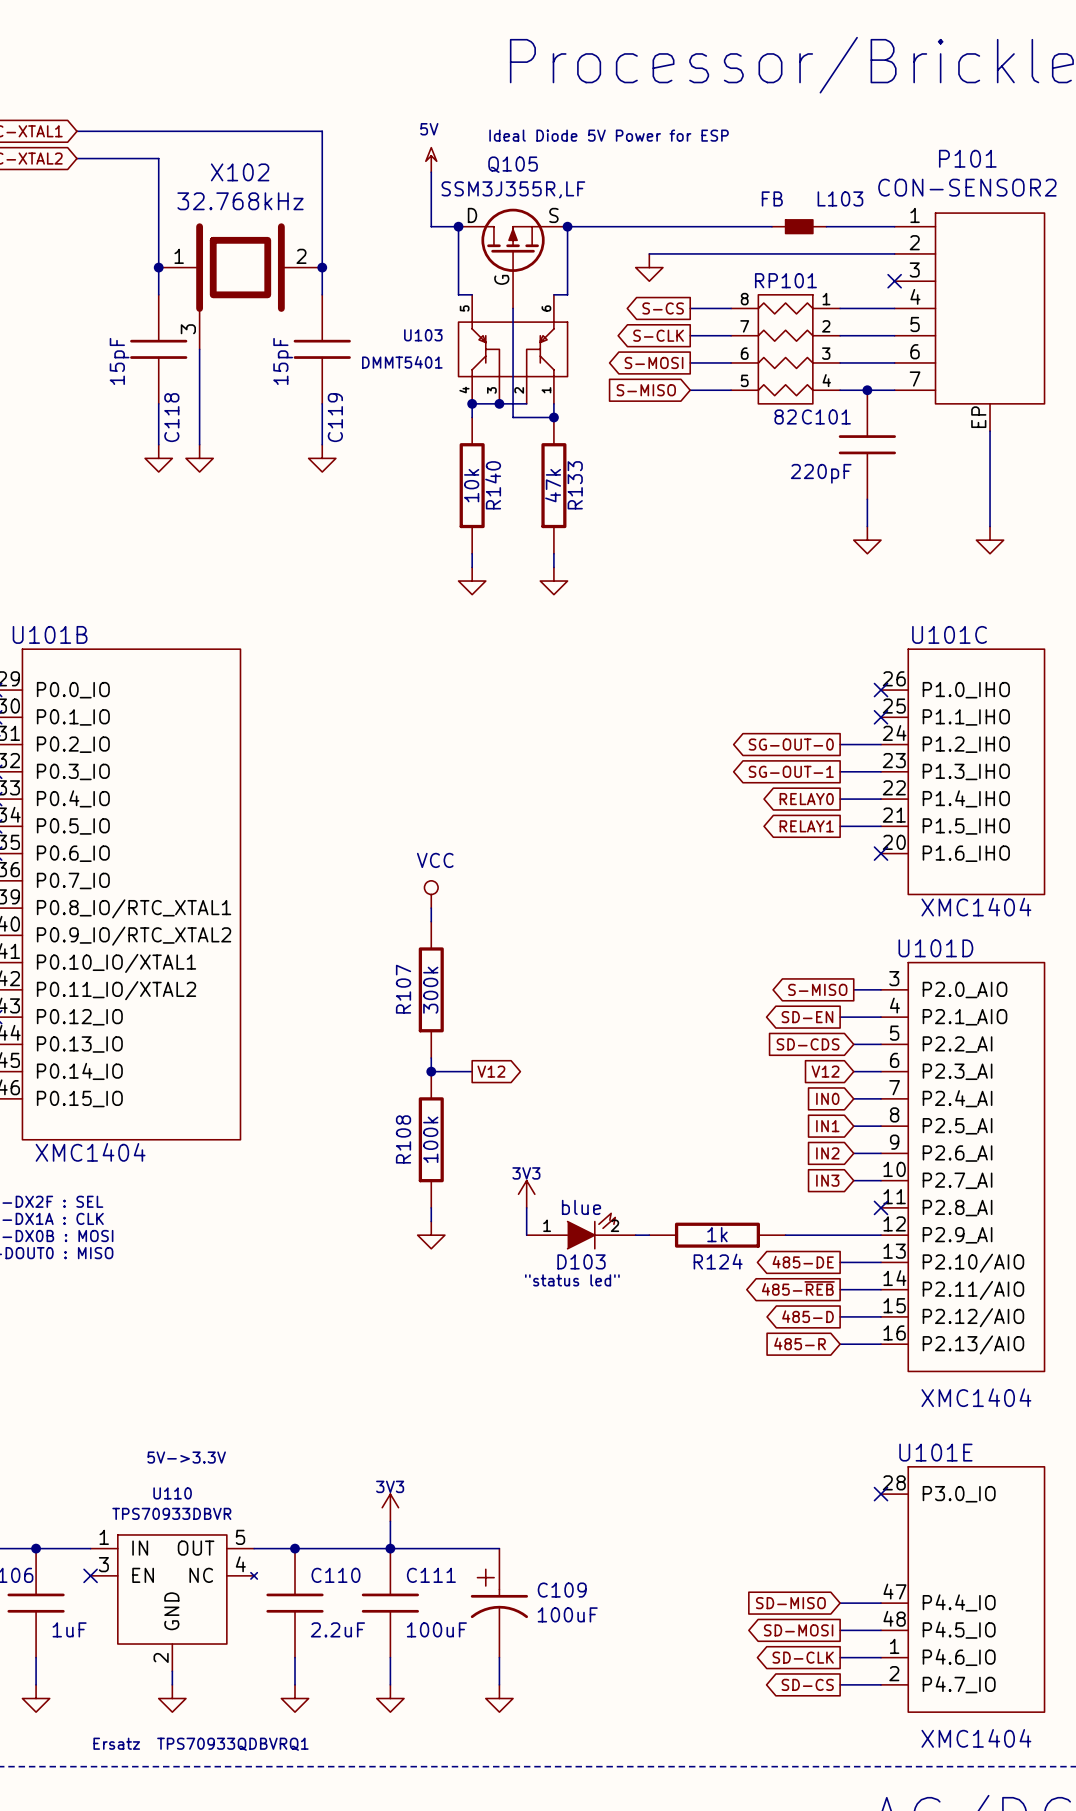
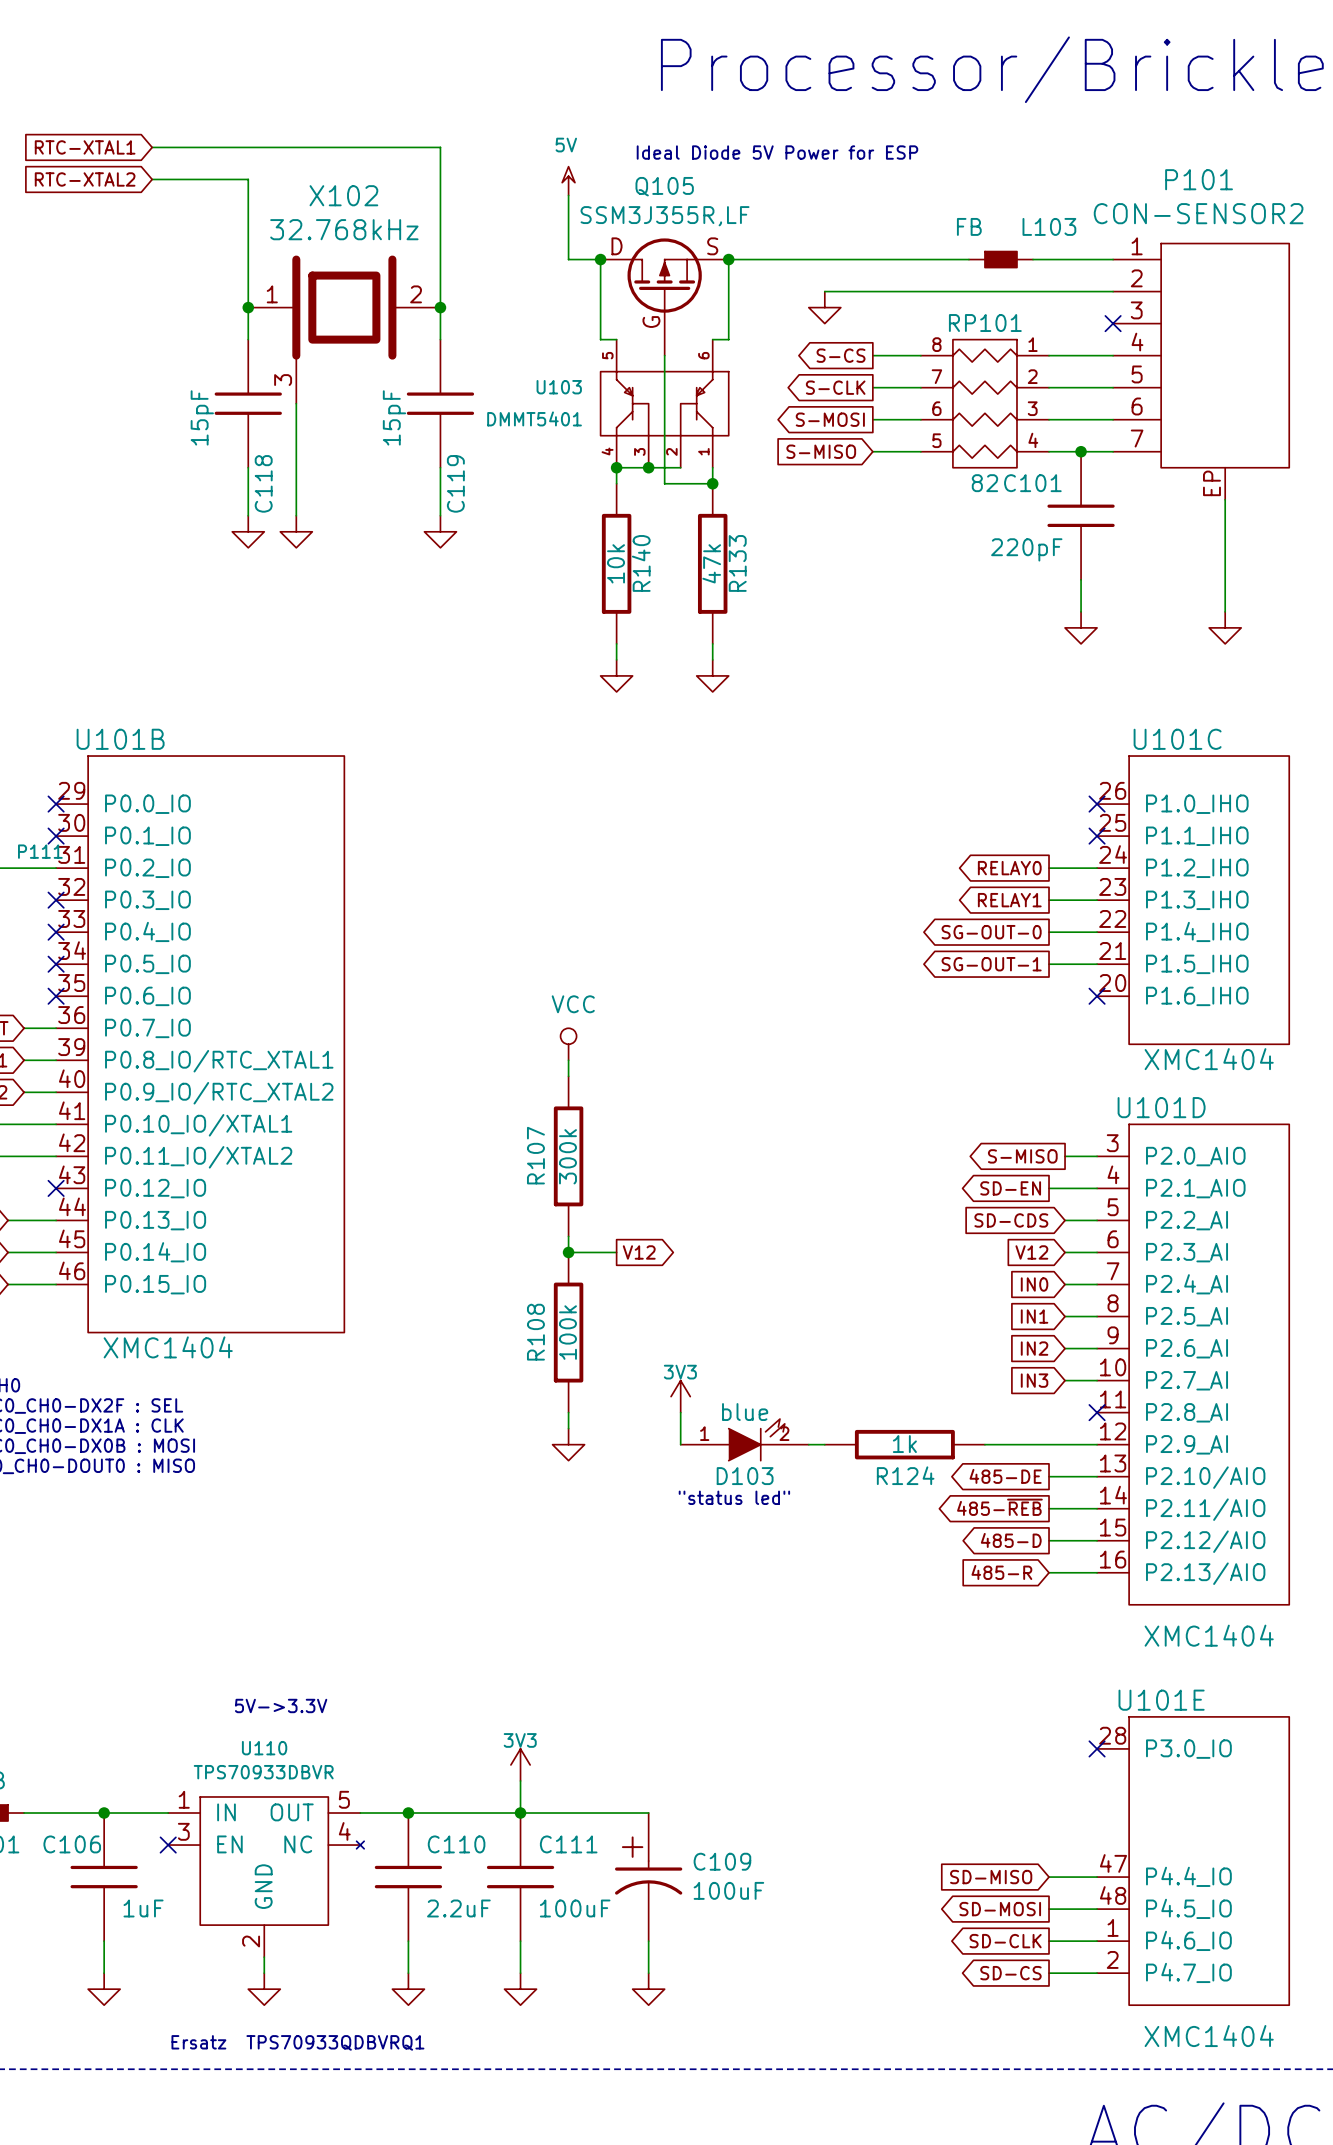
global label: SG-OUT-0 (791, 744) -> RELAY0 (1009, 868)
global label: SG-OUT-1 (791, 771) -> RELAY1 (1009, 900)
global label: RELAY0 (806, 799) -> SG-OUT-0 (991, 932)
global label: RELAY1 (806, 826) -> SG-OUT-1 (991, 964)

